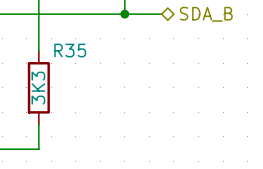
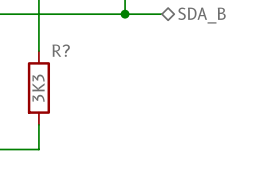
R35 name: R35 (70, 50) -> R? (61, 50)

